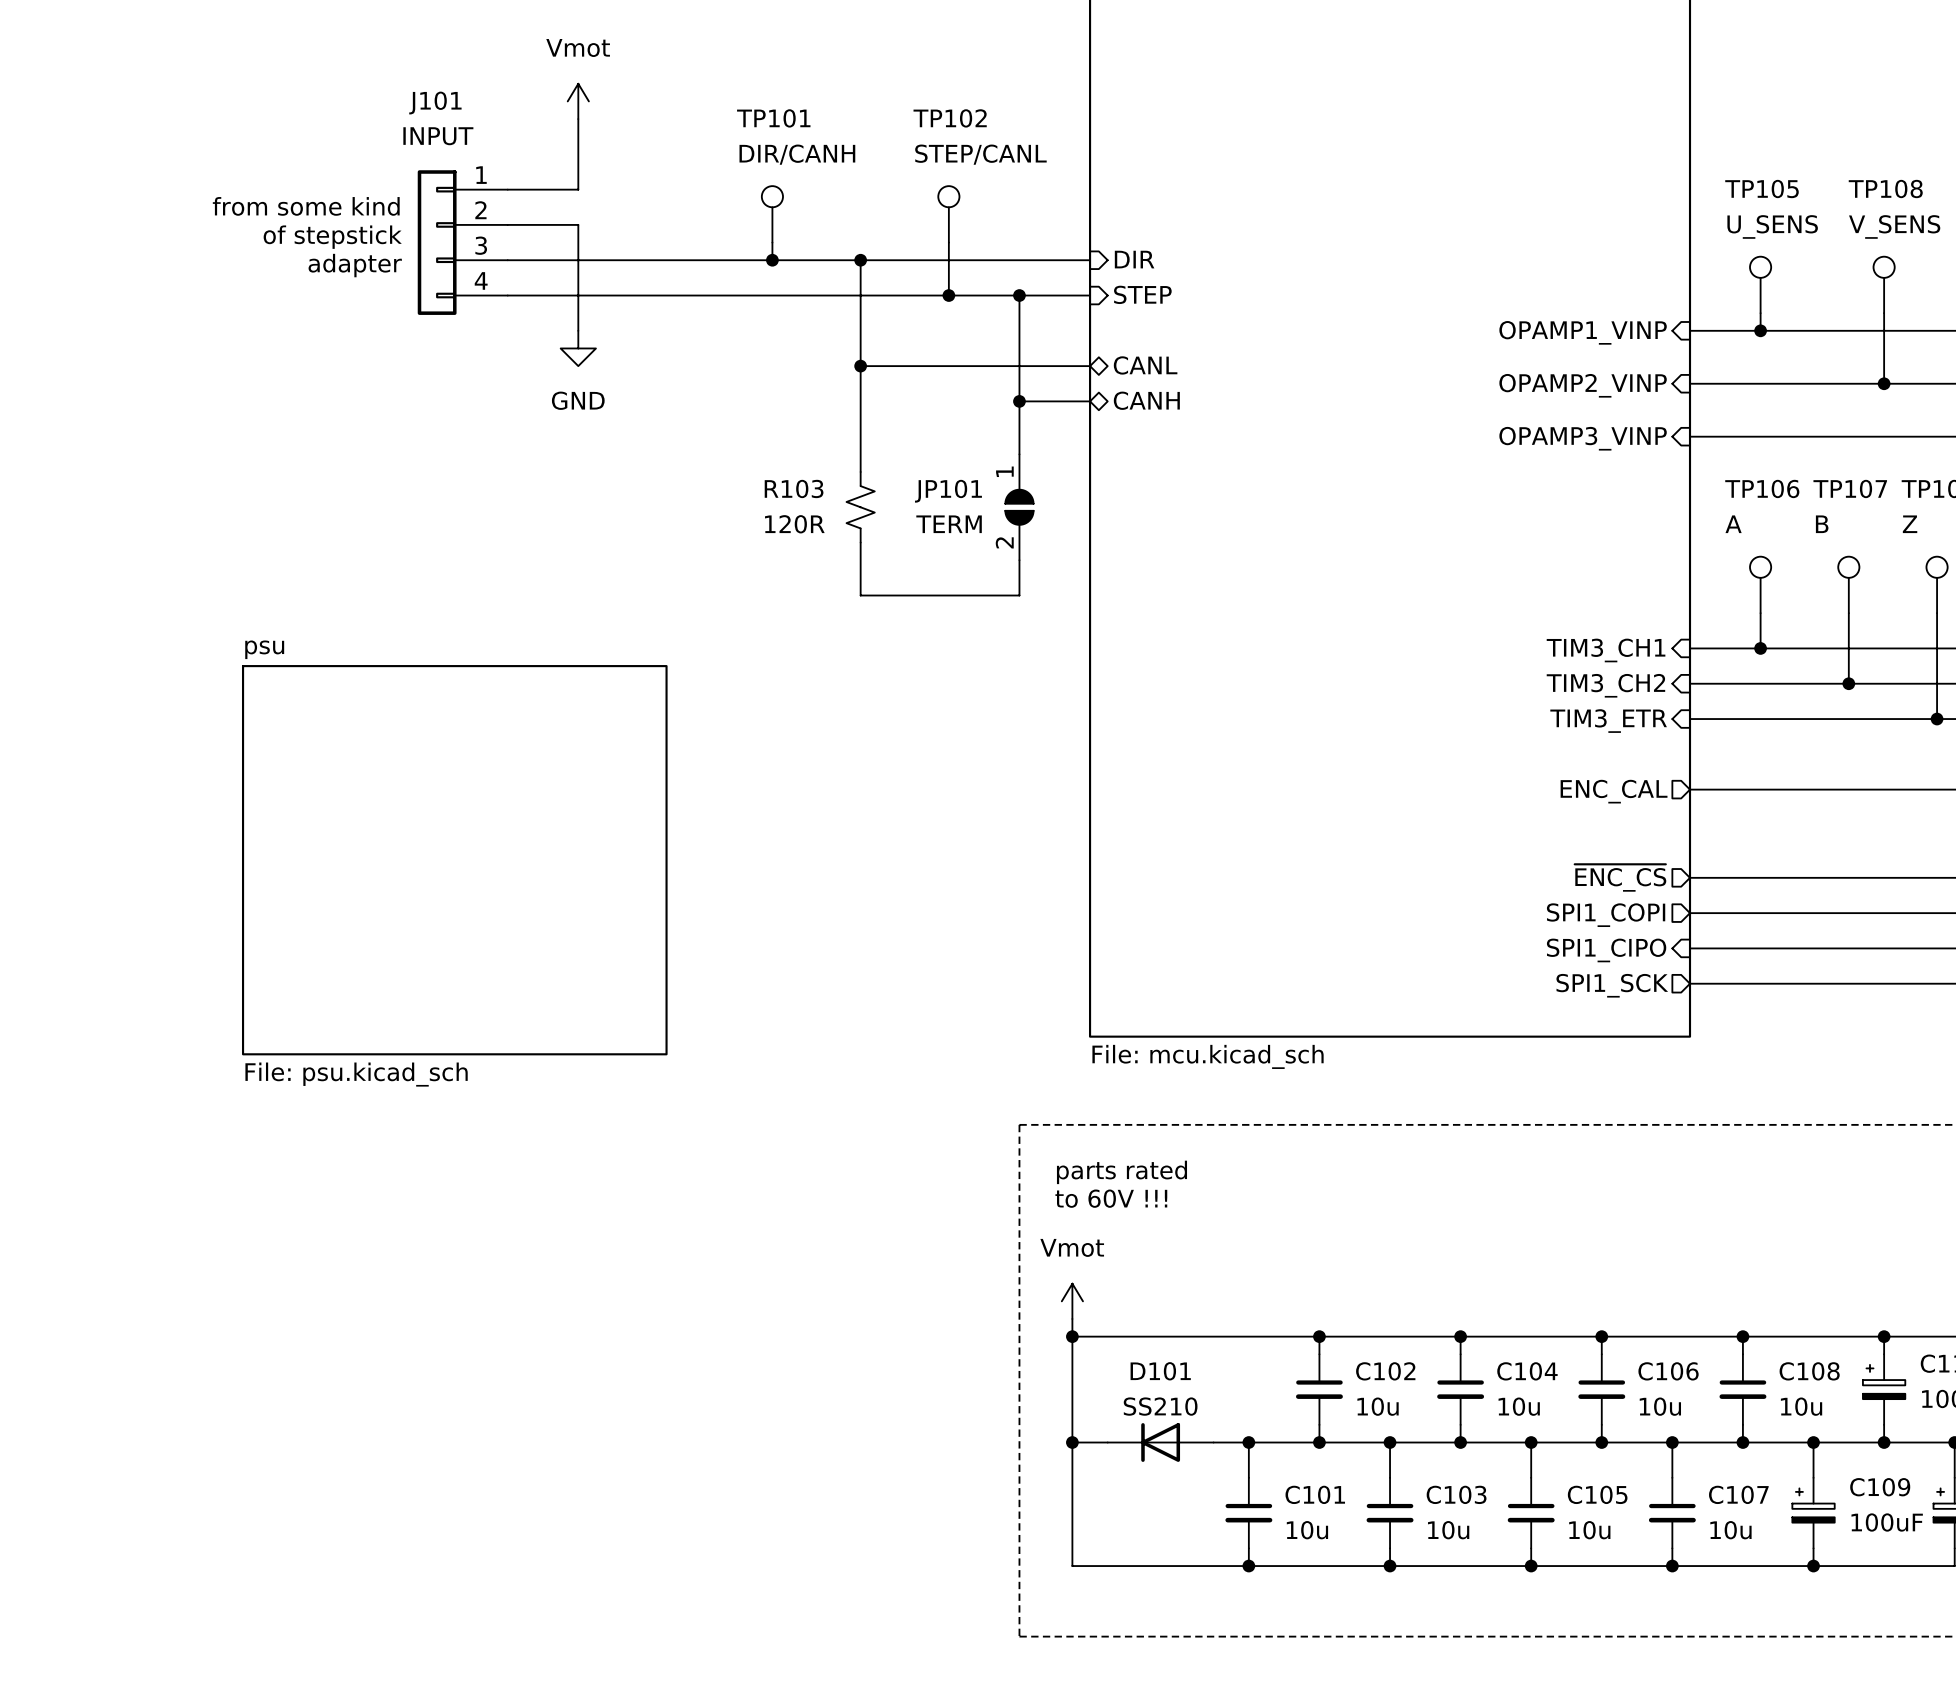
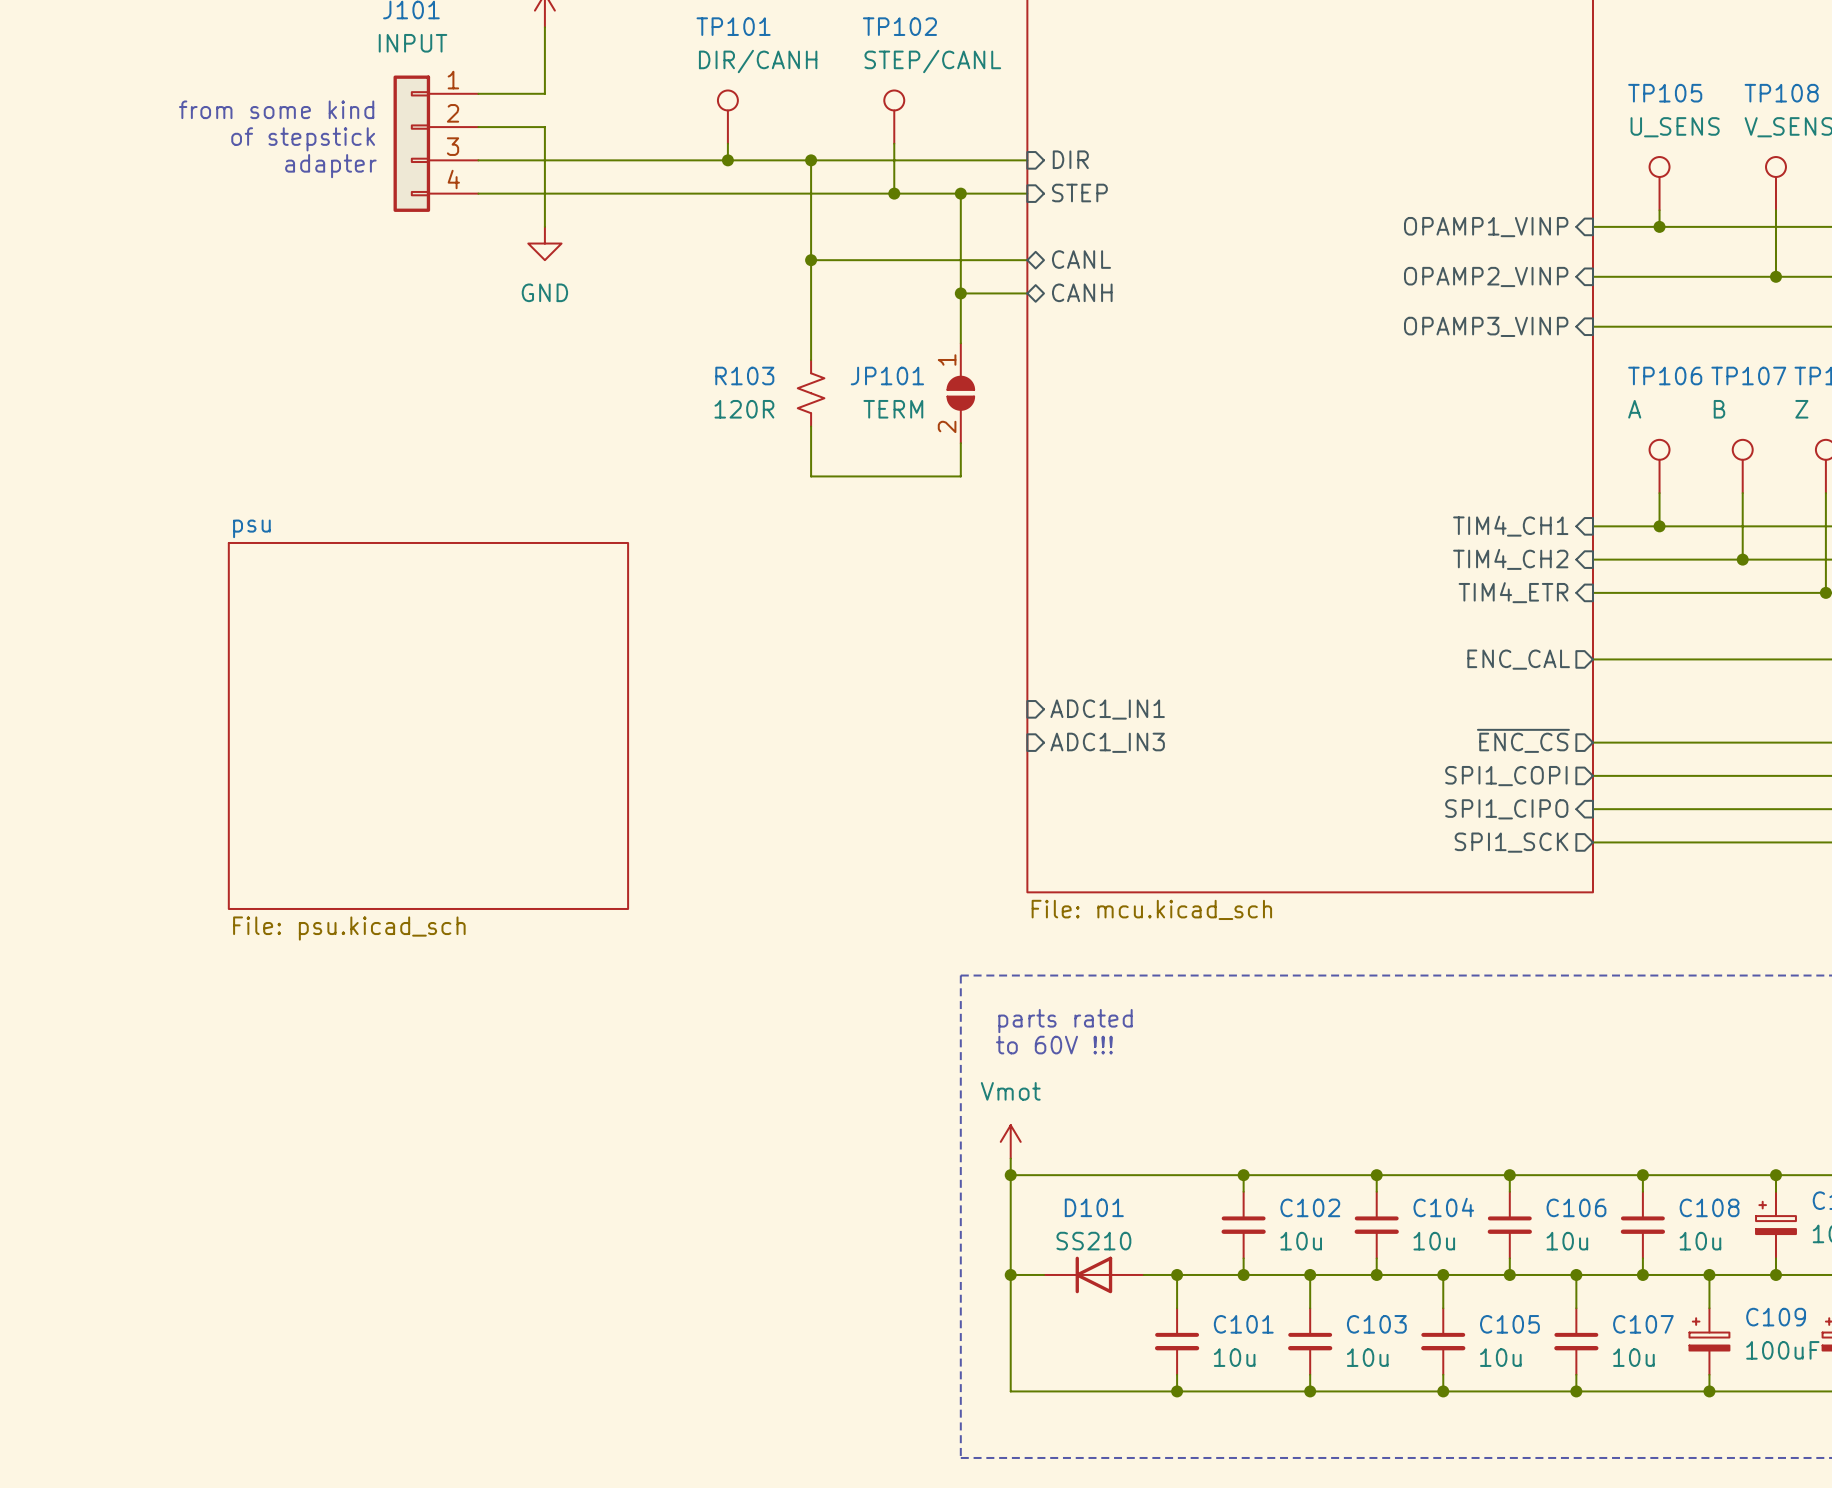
sheet pin: TIM3_CH1 (1606, 650) -> TIM4_CH1 (1510, 526)
sheet pin: TIM3_CH2 (1605, 685) -> TIM4_CH2 (1510, 559)
sheet pin: TIM3_ETR (1608, 721) -> TIM4_ETR (1513, 592)
sheet pin: none -> ADC1_IN1 (1107, 709)
sheet pin: none -> ADC1_IN3 (1107, 742)

